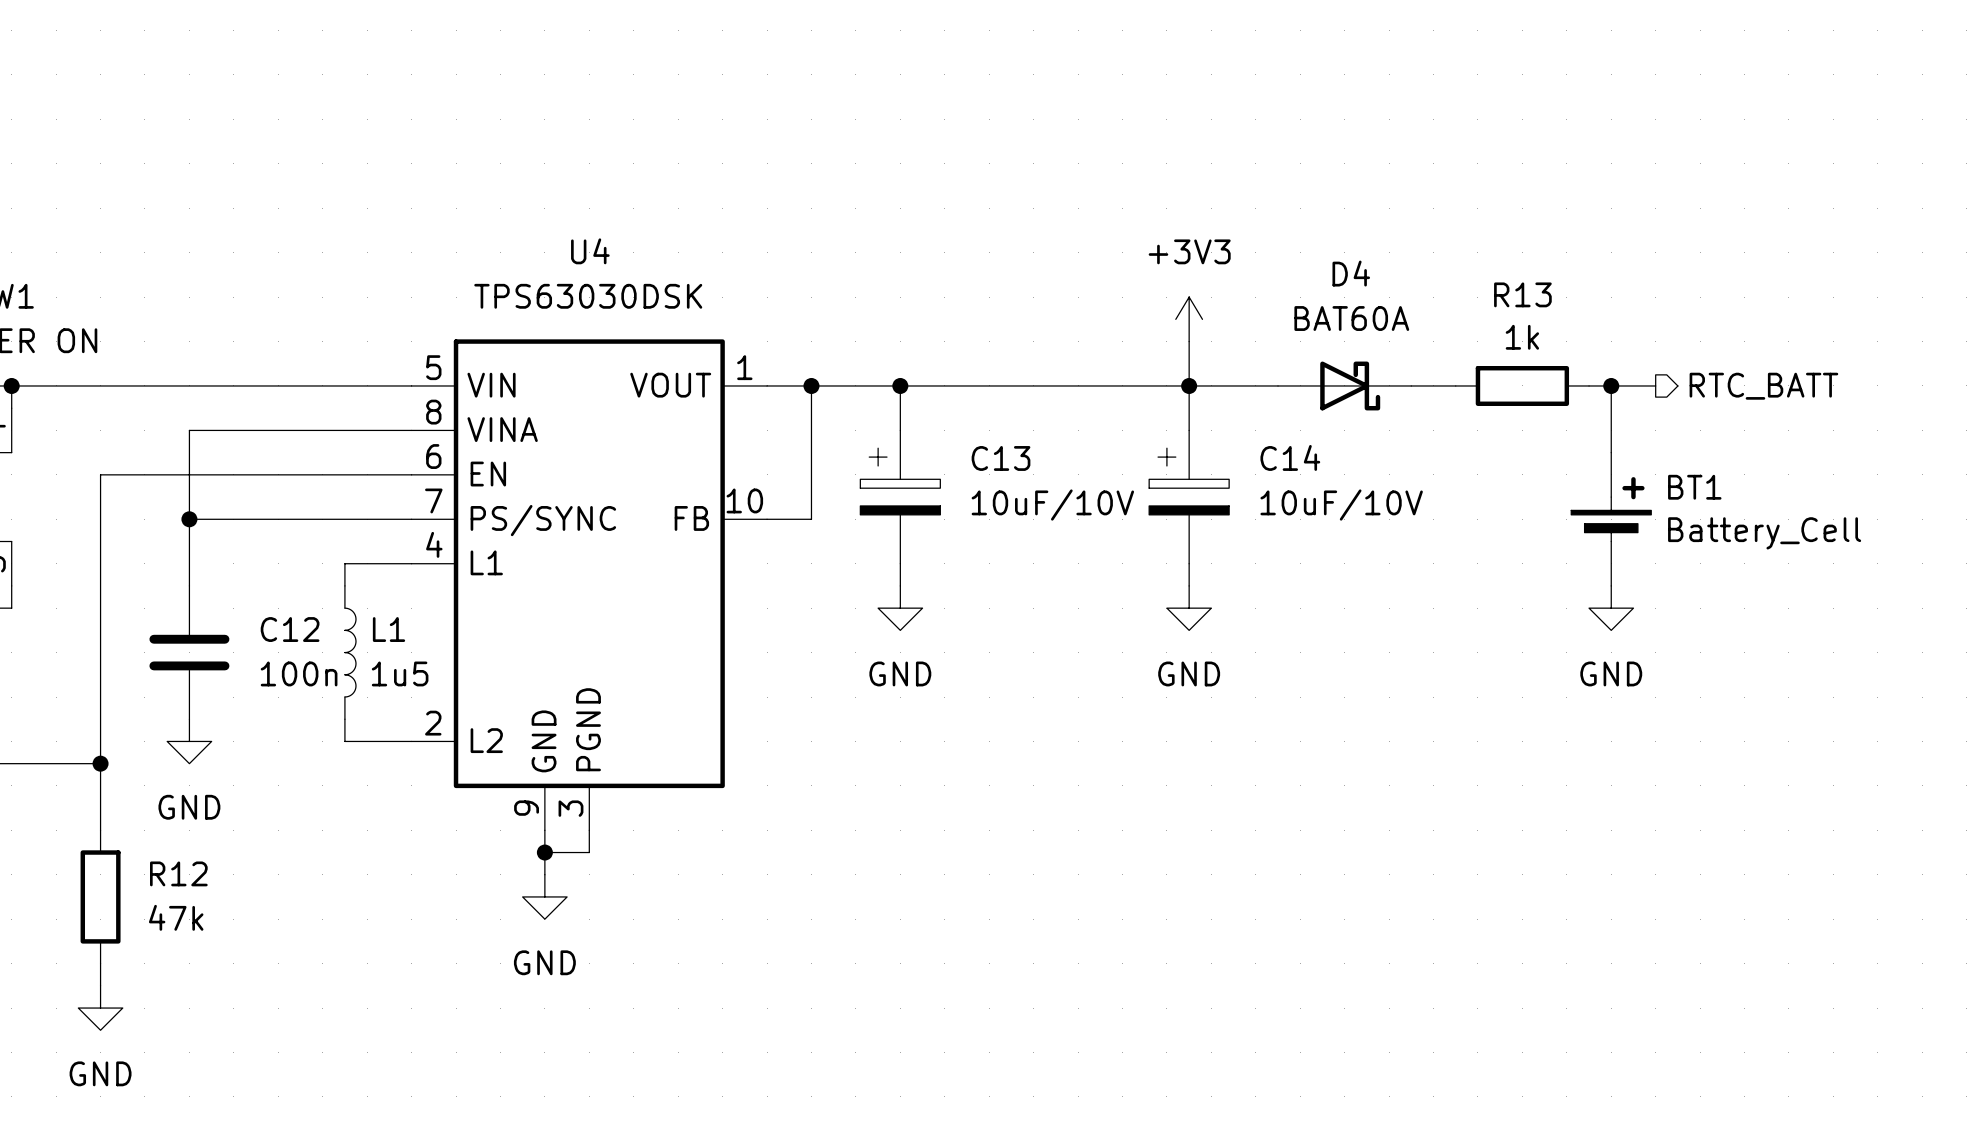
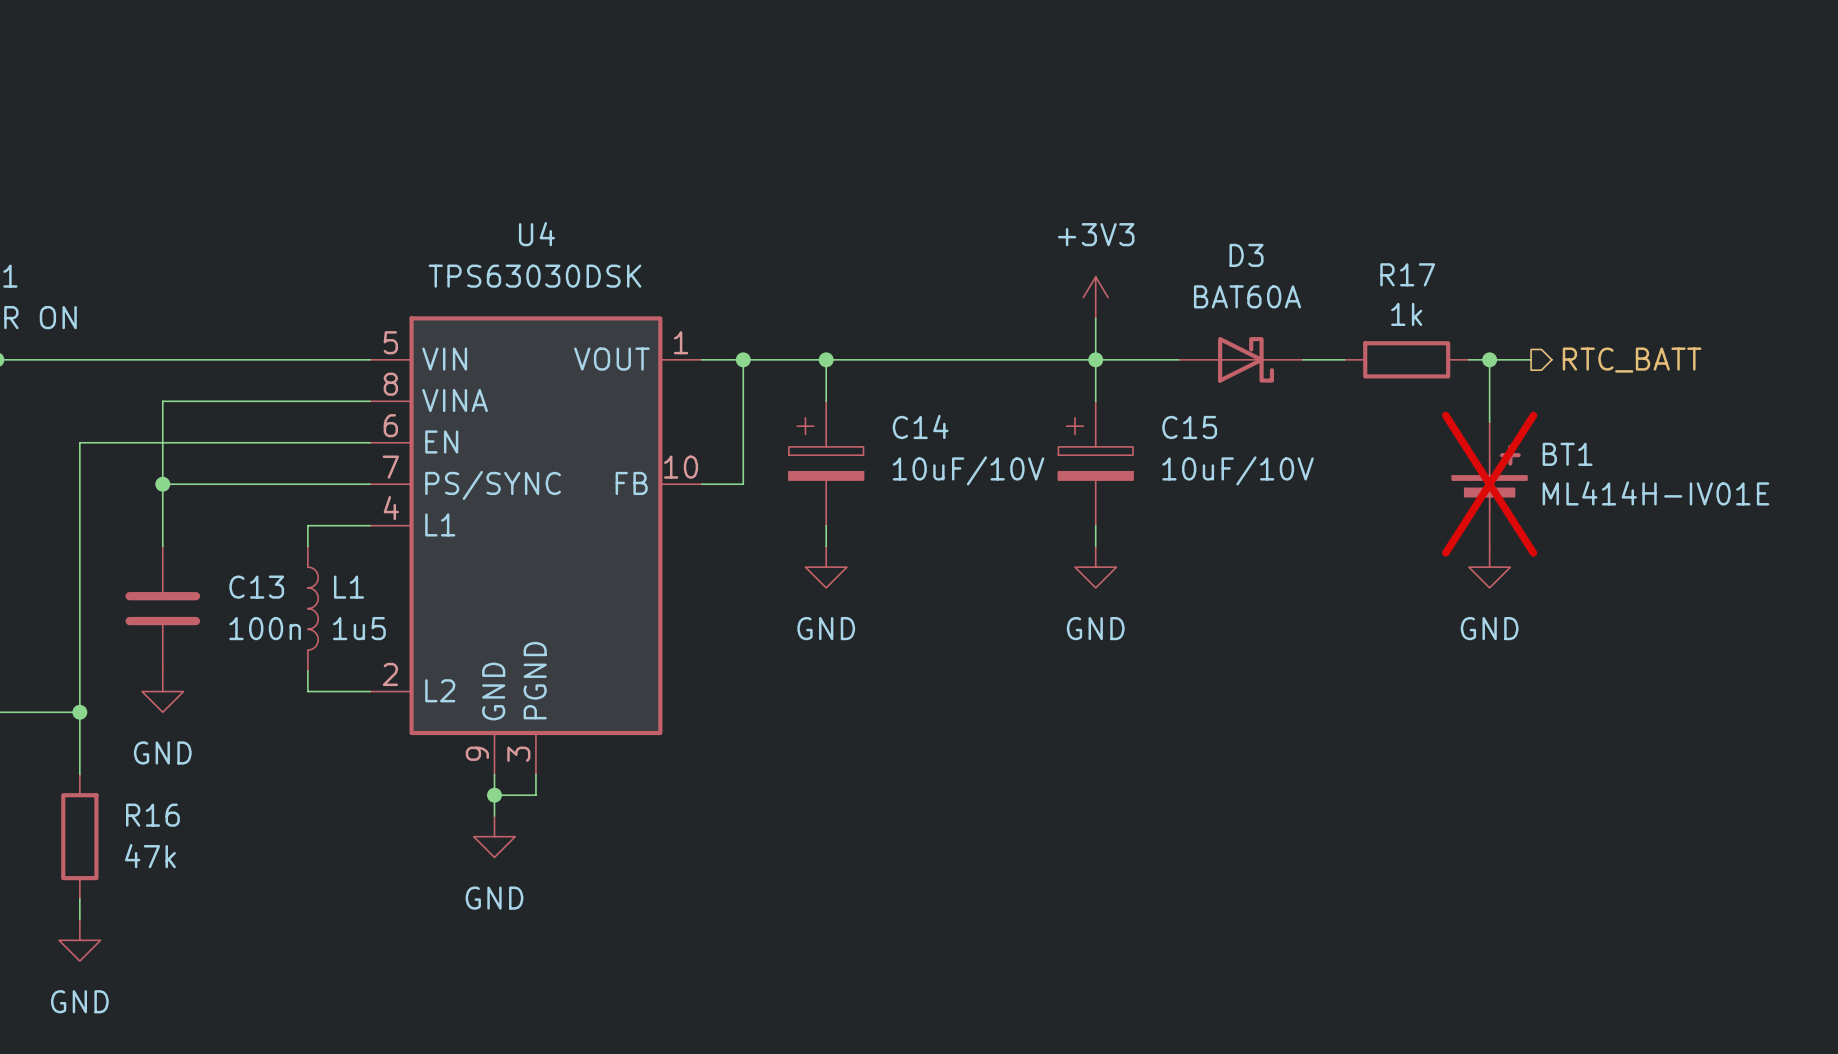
D4 name: D4 (1351, 273) -> D3 (1246, 255)
R13 name: R13 (1522, 294) -> R17 (1407, 274)
C14 name: C14 (1290, 457) -> C15 (1189, 427)
C13 name: C13 (1001, 458) -> C14 (920, 426)
BT1 do-not-place cross: none -> (1489, 484)
BT1 value: Battery_Cell (1764, 533) -> ML414H-IV01E (1655, 493)
C12 name: C12 (290, 629) -> C13 (256, 587)
R12 name: R12 (178, 873) -> R16 (152, 815)

